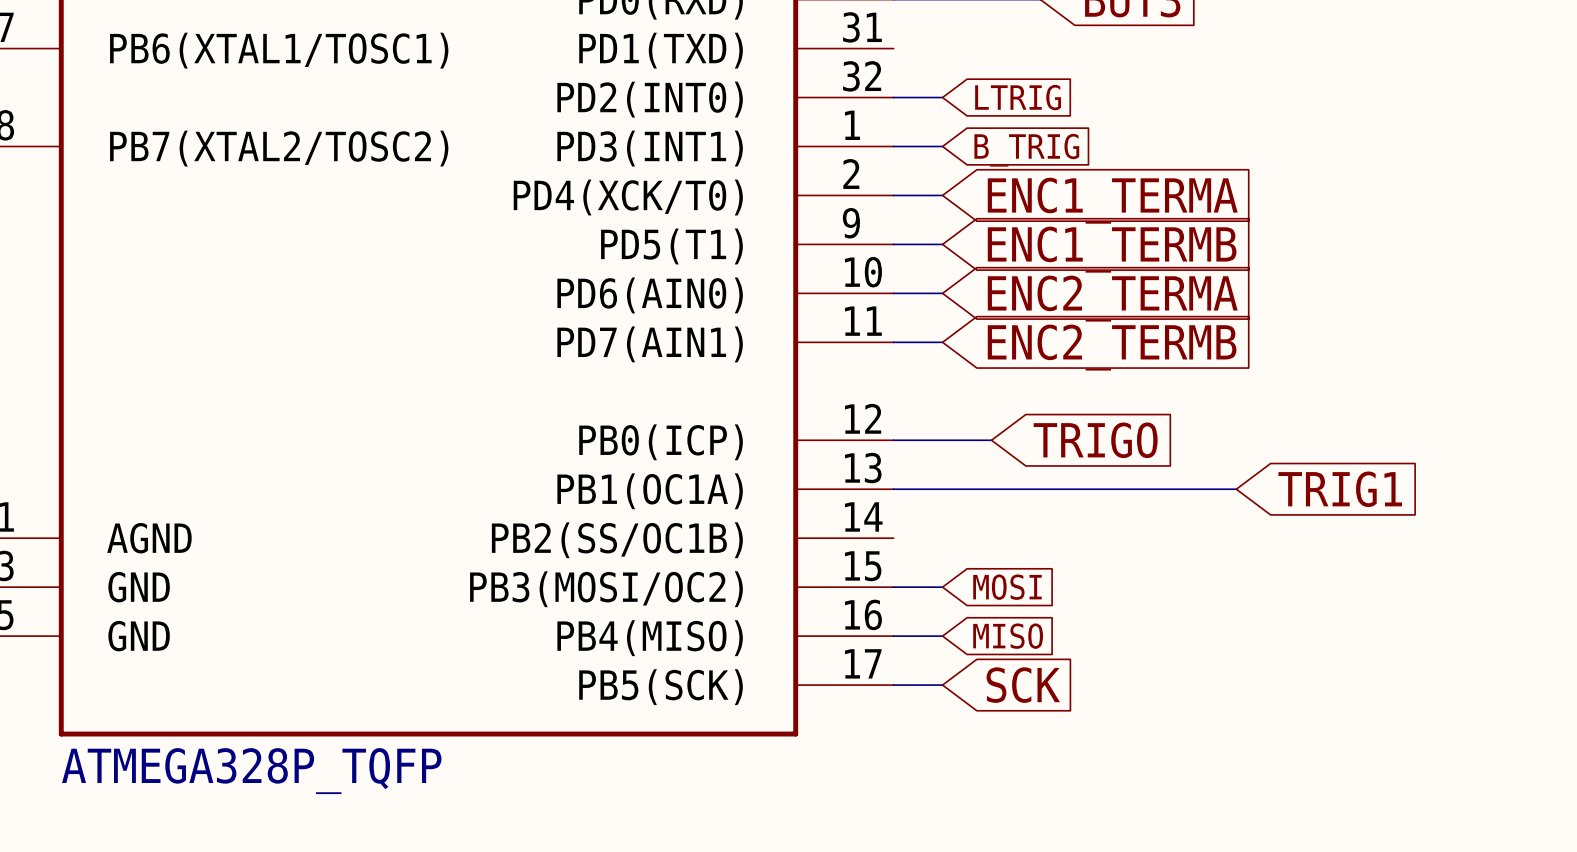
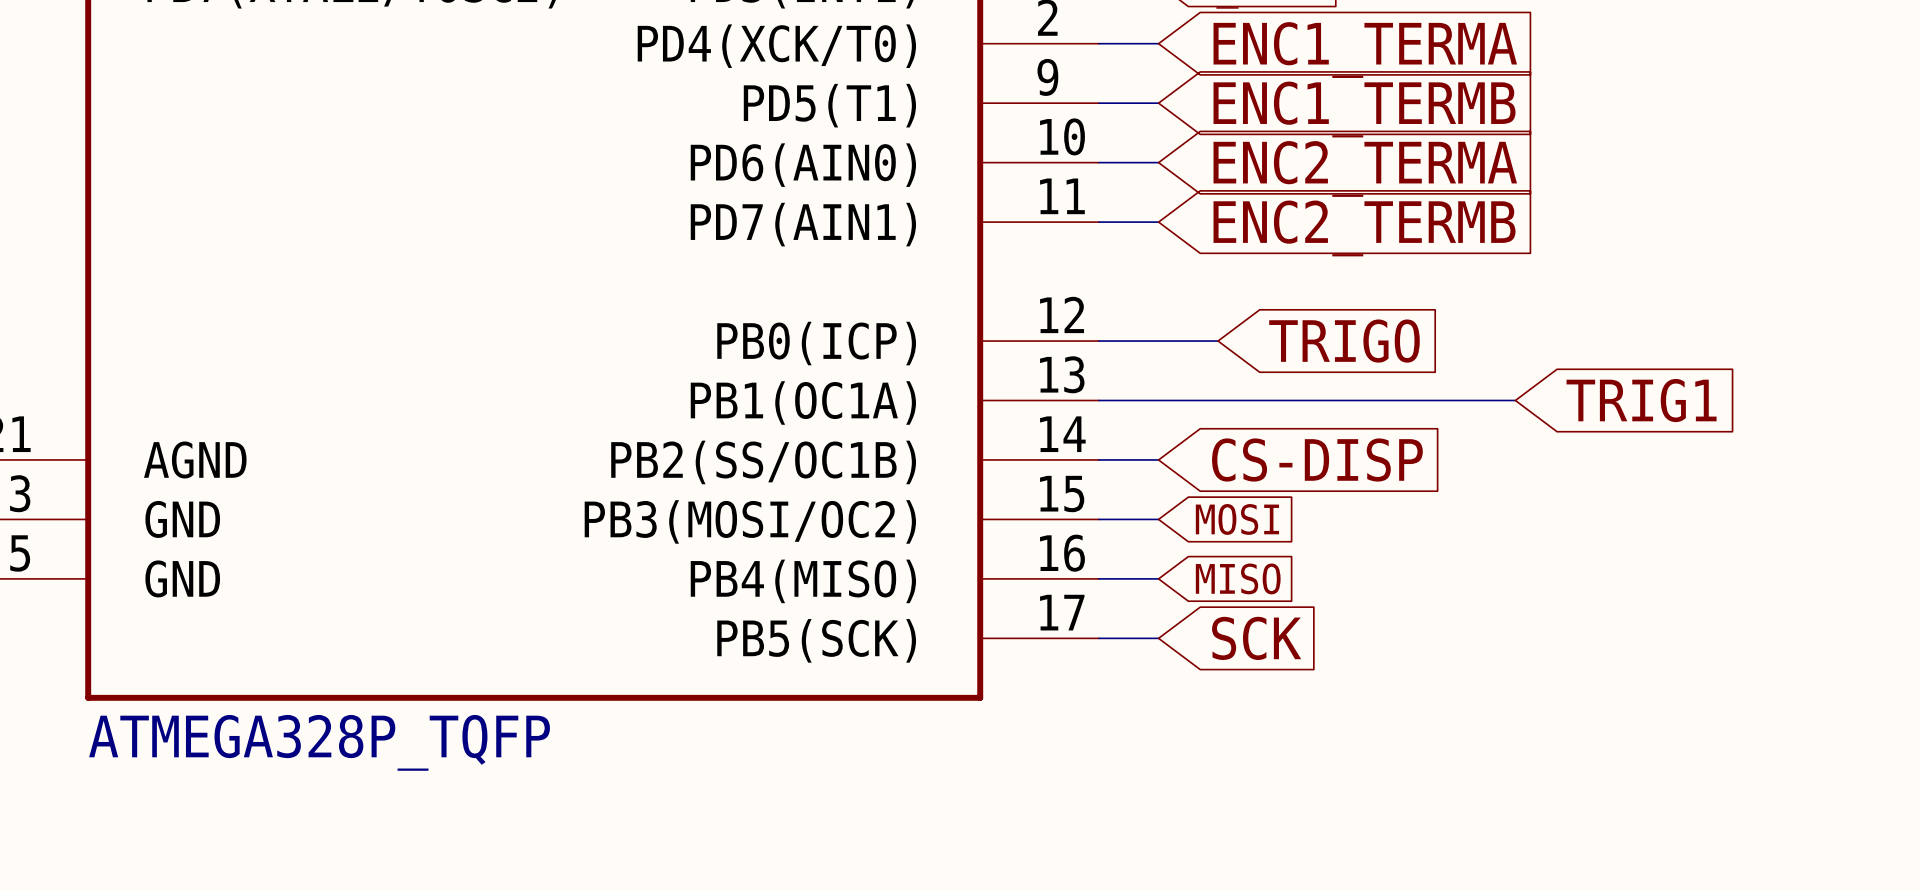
wire: none -> (1099, 459) (1158, 459)
global label: none -> CS-DISP (1317, 459)

